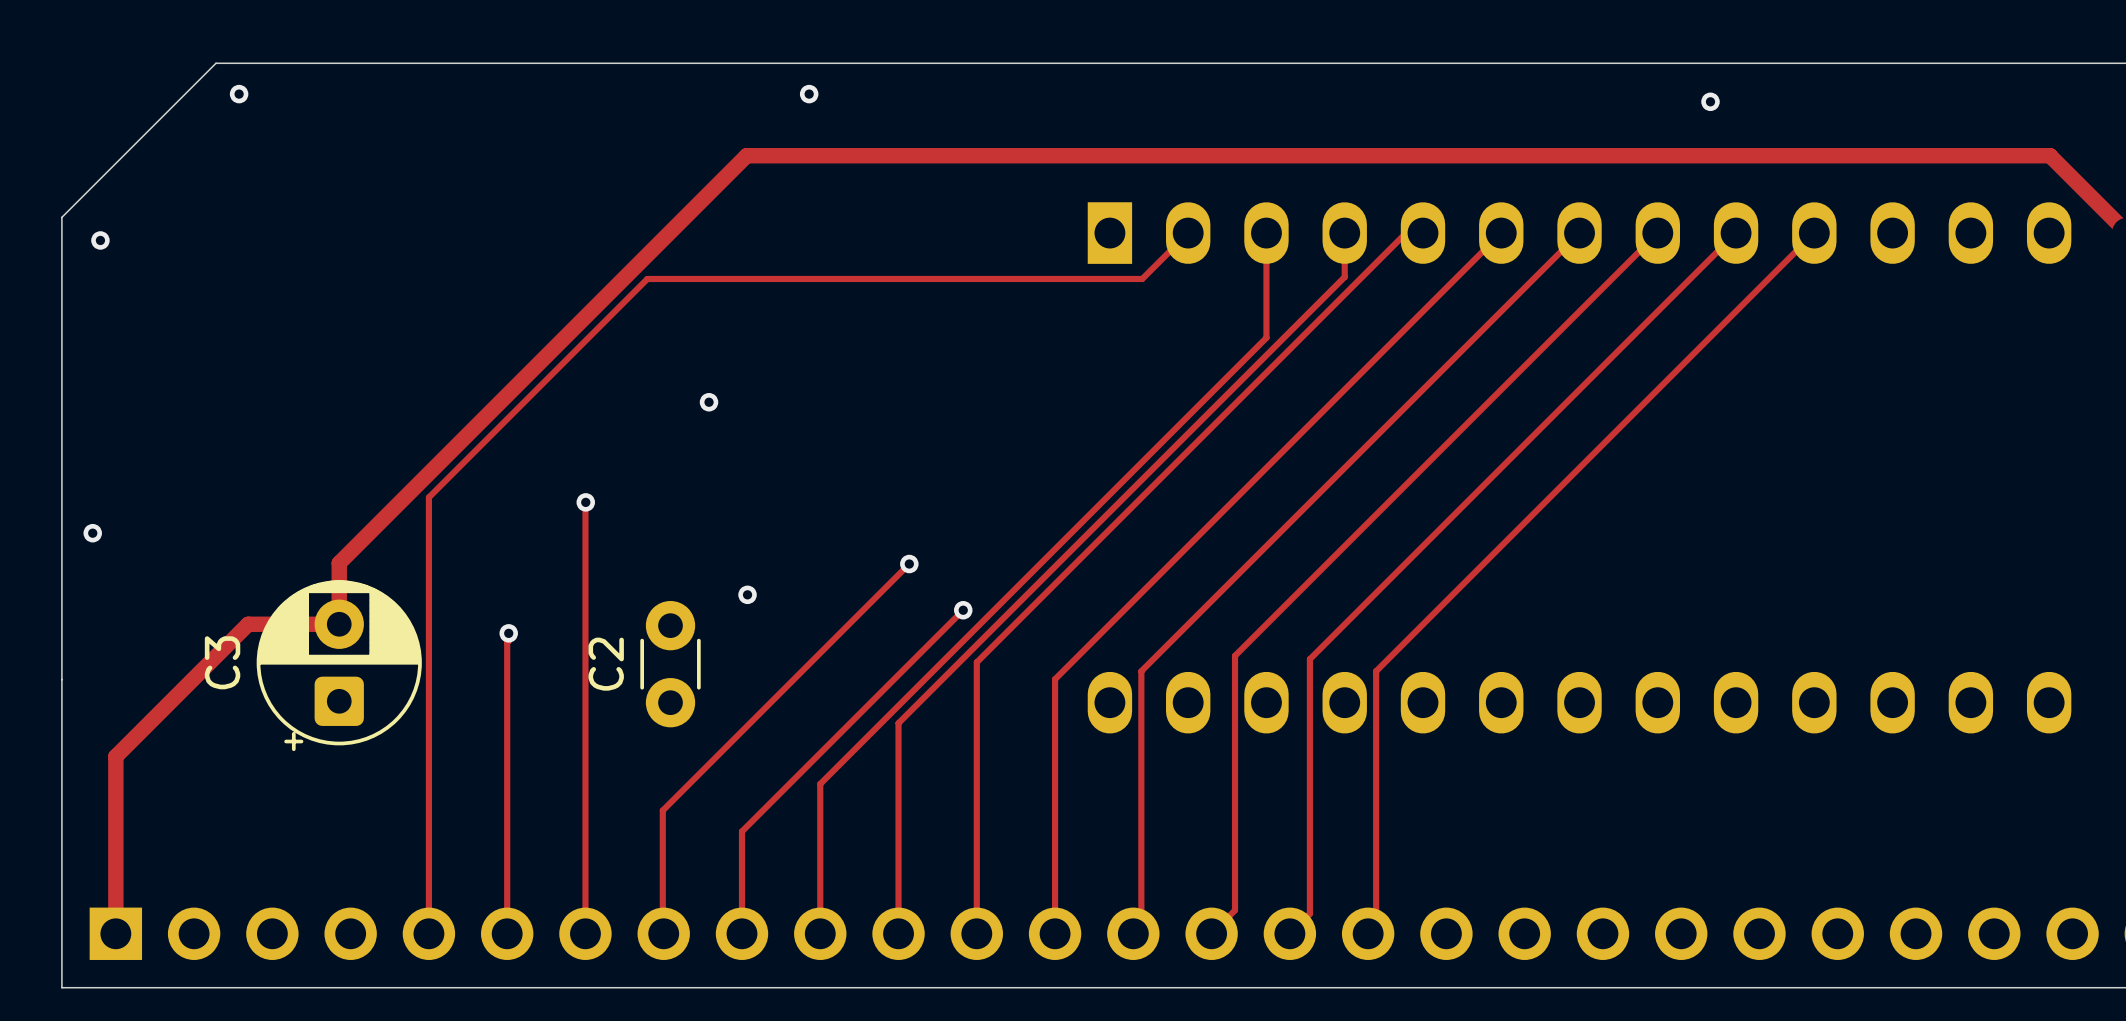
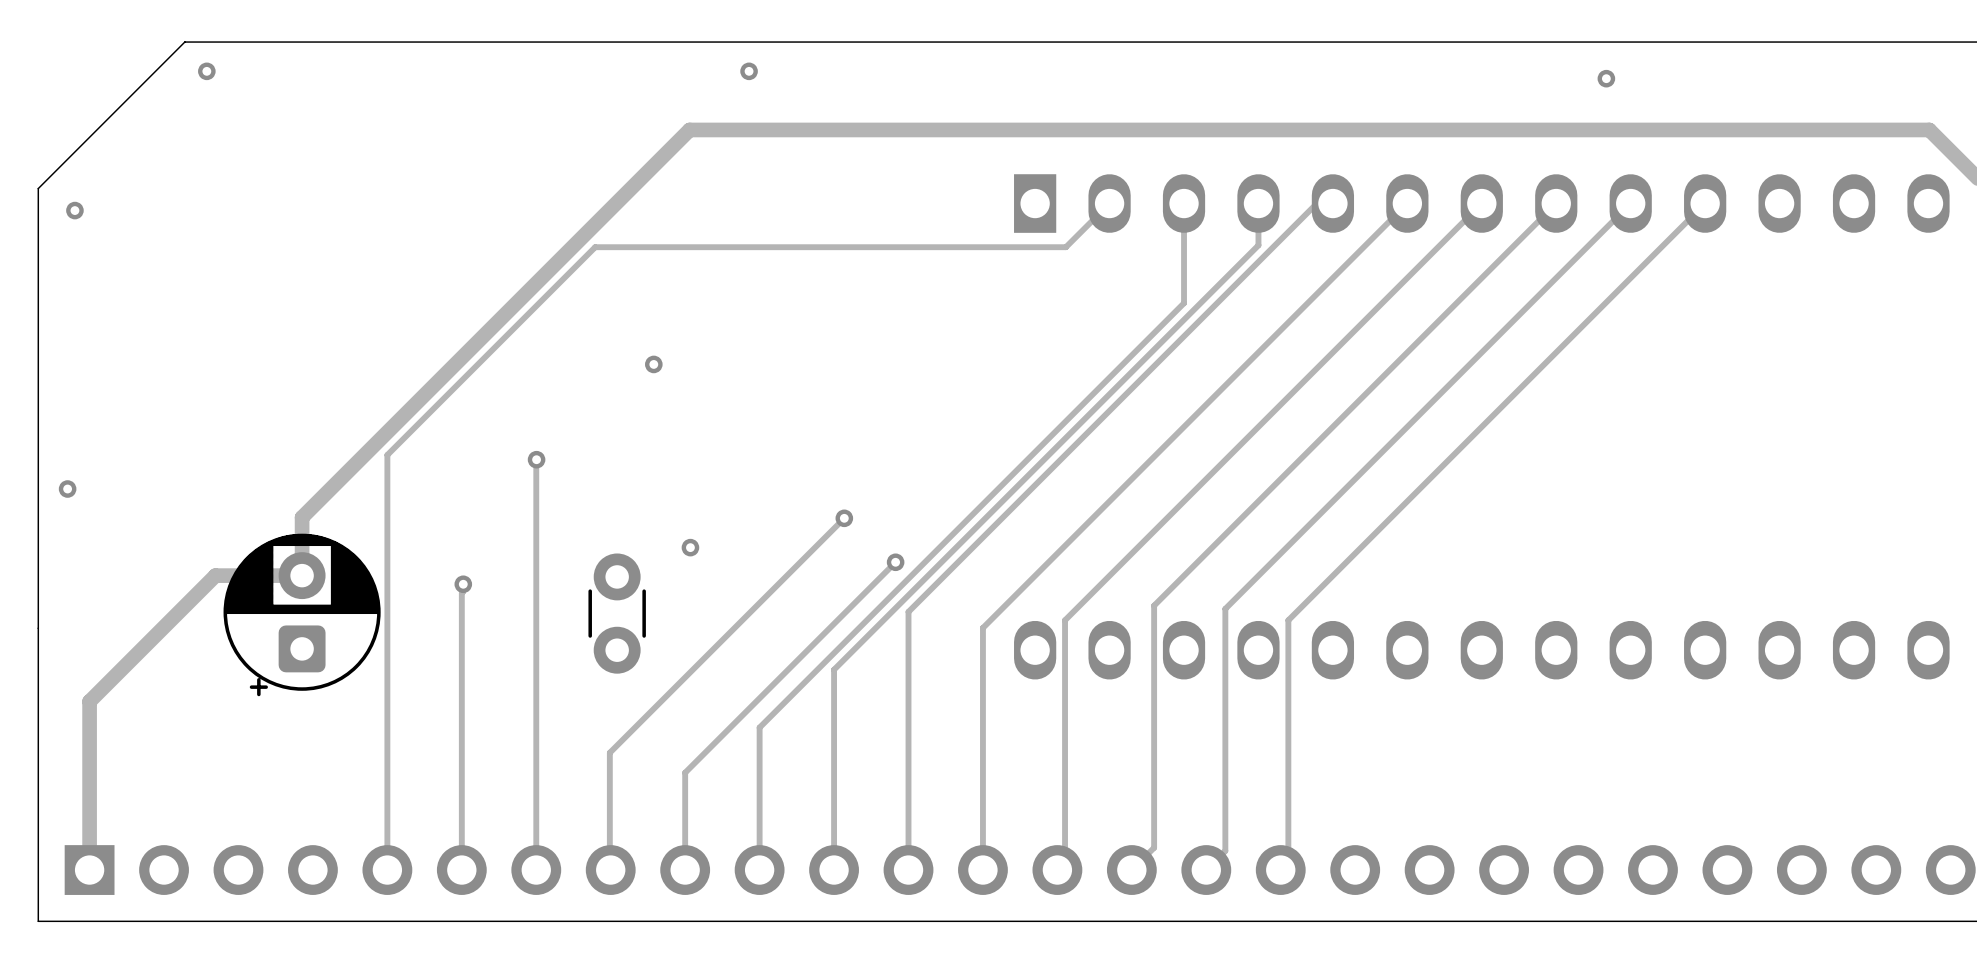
C3 name: C3 (222, 662) -> none
C2 name: C2 (606, 664) -> none

